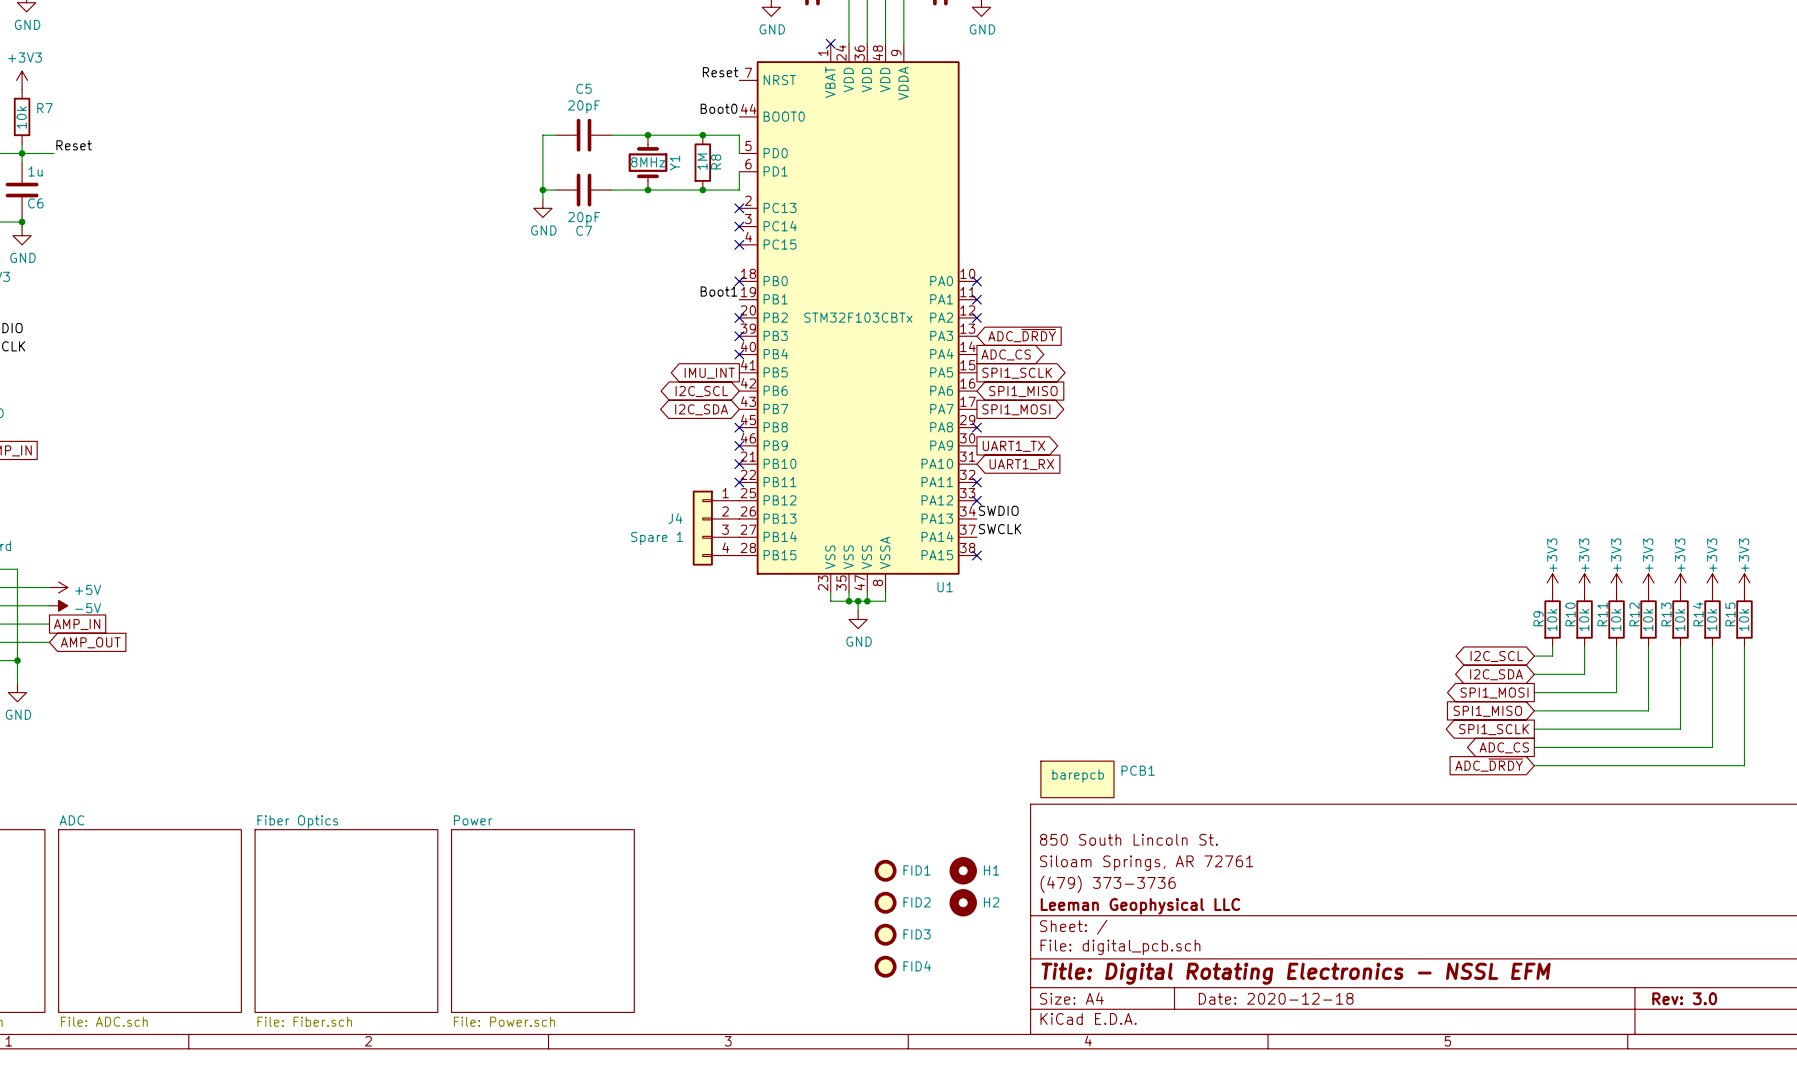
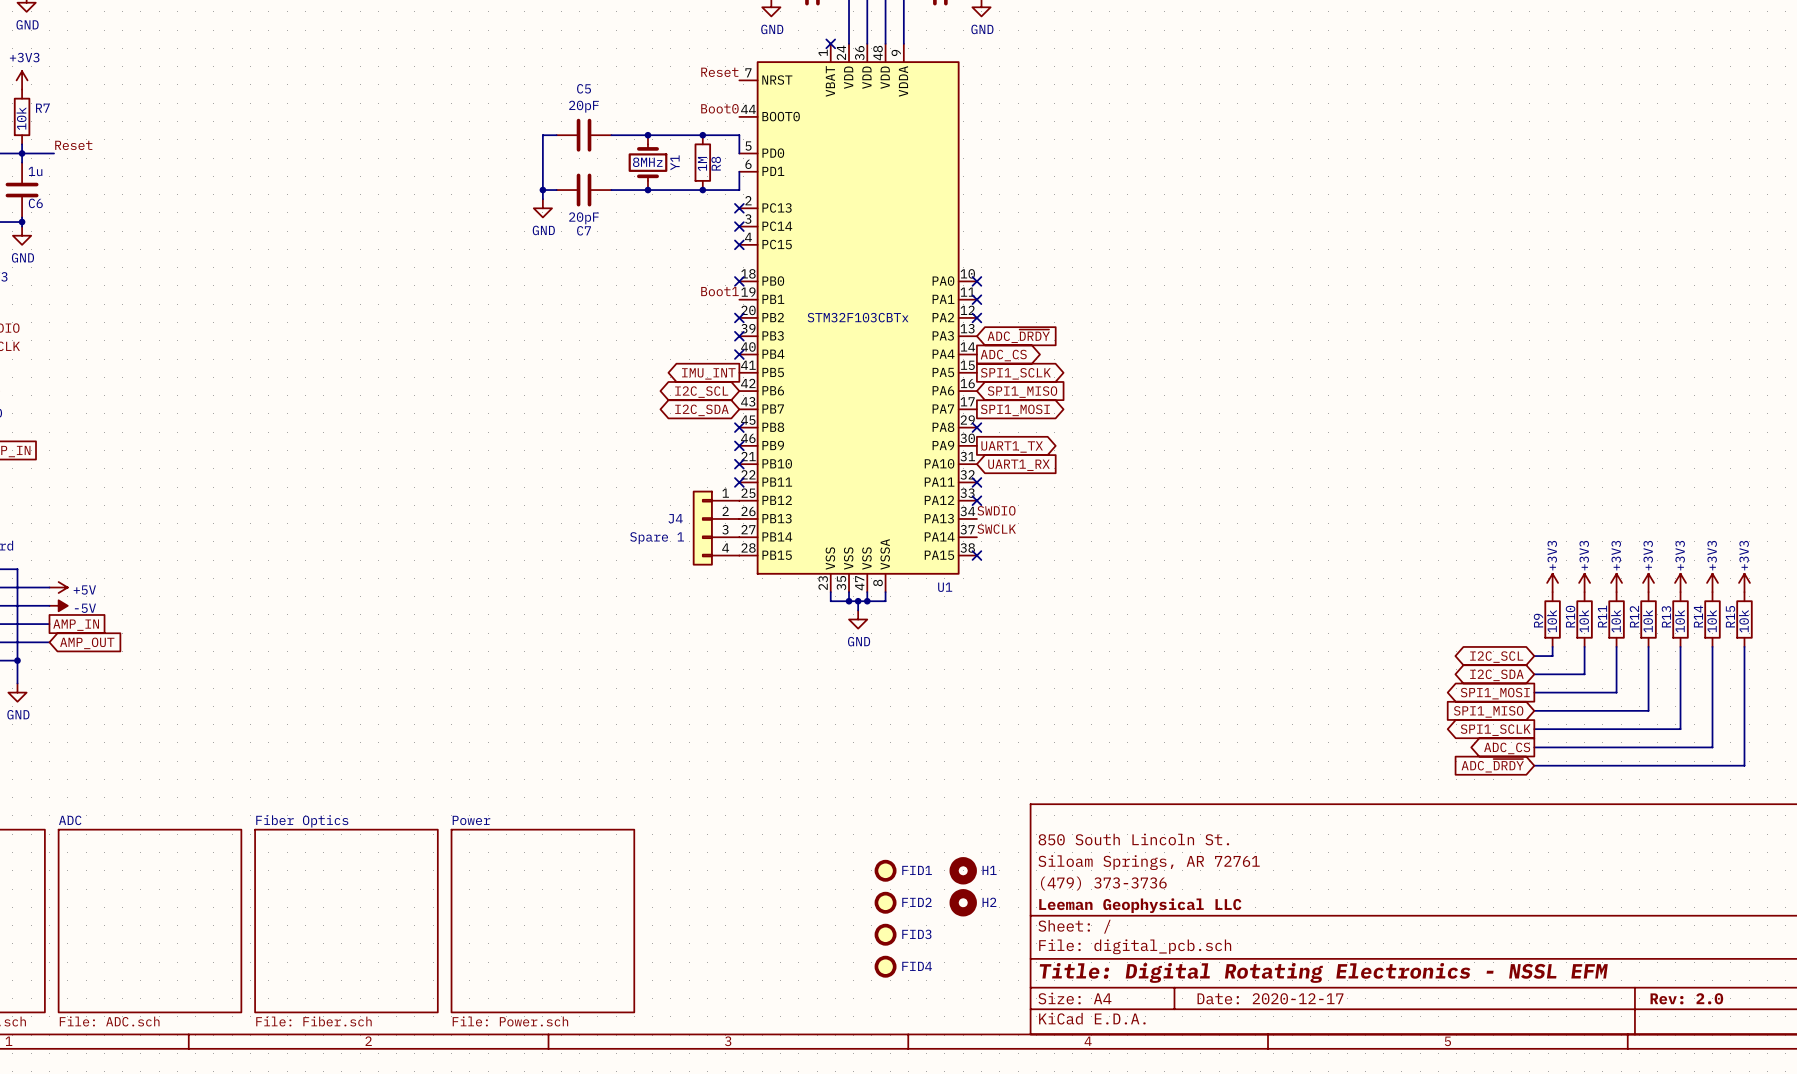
PCB1: barepcb (1077, 779) -> none
title block: Date: 2020-12-18 (1276, 998) -> Date: 2020-12-17 (1270, 998)
title block: Rev: 3.0 (1684, 998) -> Rev: 2.0 (1686, 998)

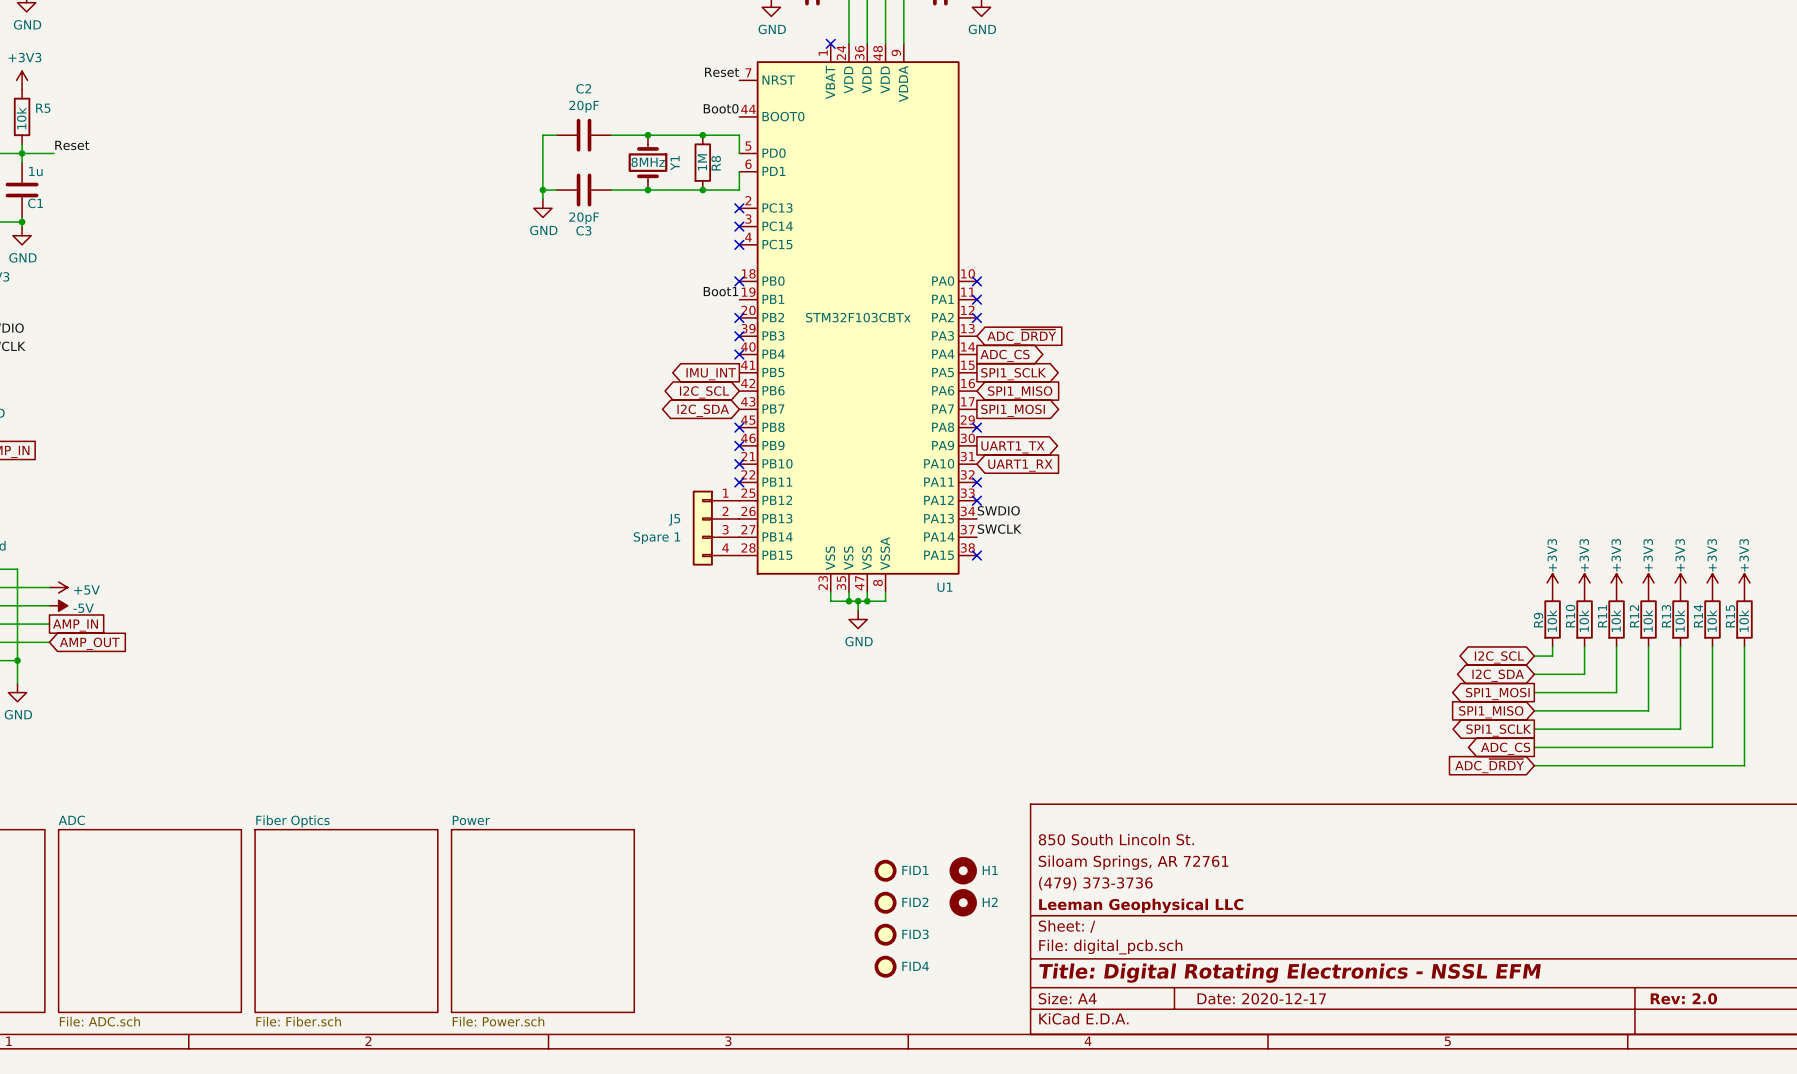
C5 name: C5 (584, 88) -> C2 (583, 88)
R7 name: R7 (42, 108) -> R5 (43, 108)
C6 name: C6 (35, 203) -> C1 (35, 203)
C7 name: C7 (584, 230) -> C3 (583, 230)
J4 name: J4 (675, 518) -> J5 (674, 519)

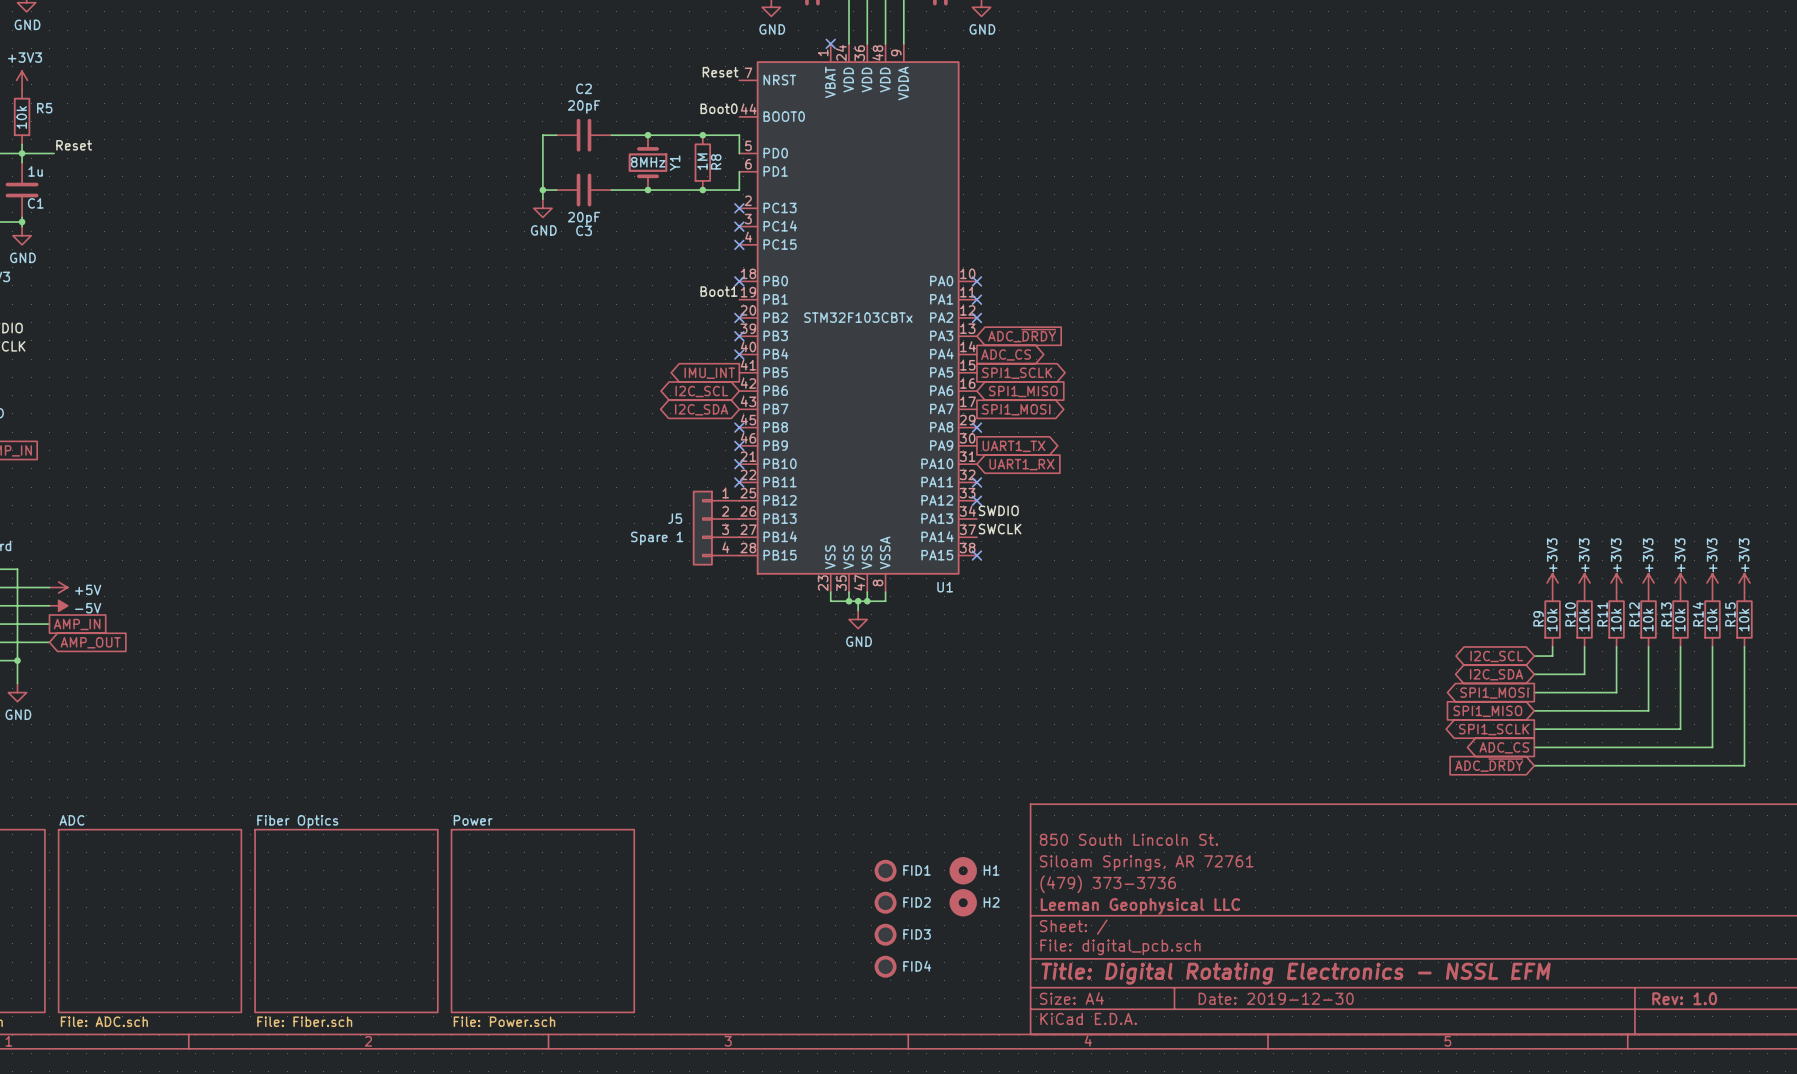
title block: Date: 2020-12-17 (1261, 998) -> Date: 2019-12-30 (1276, 998)
title block: Rev: 2.0 (1683, 998) -> Rev: 1.0 (1684, 998)

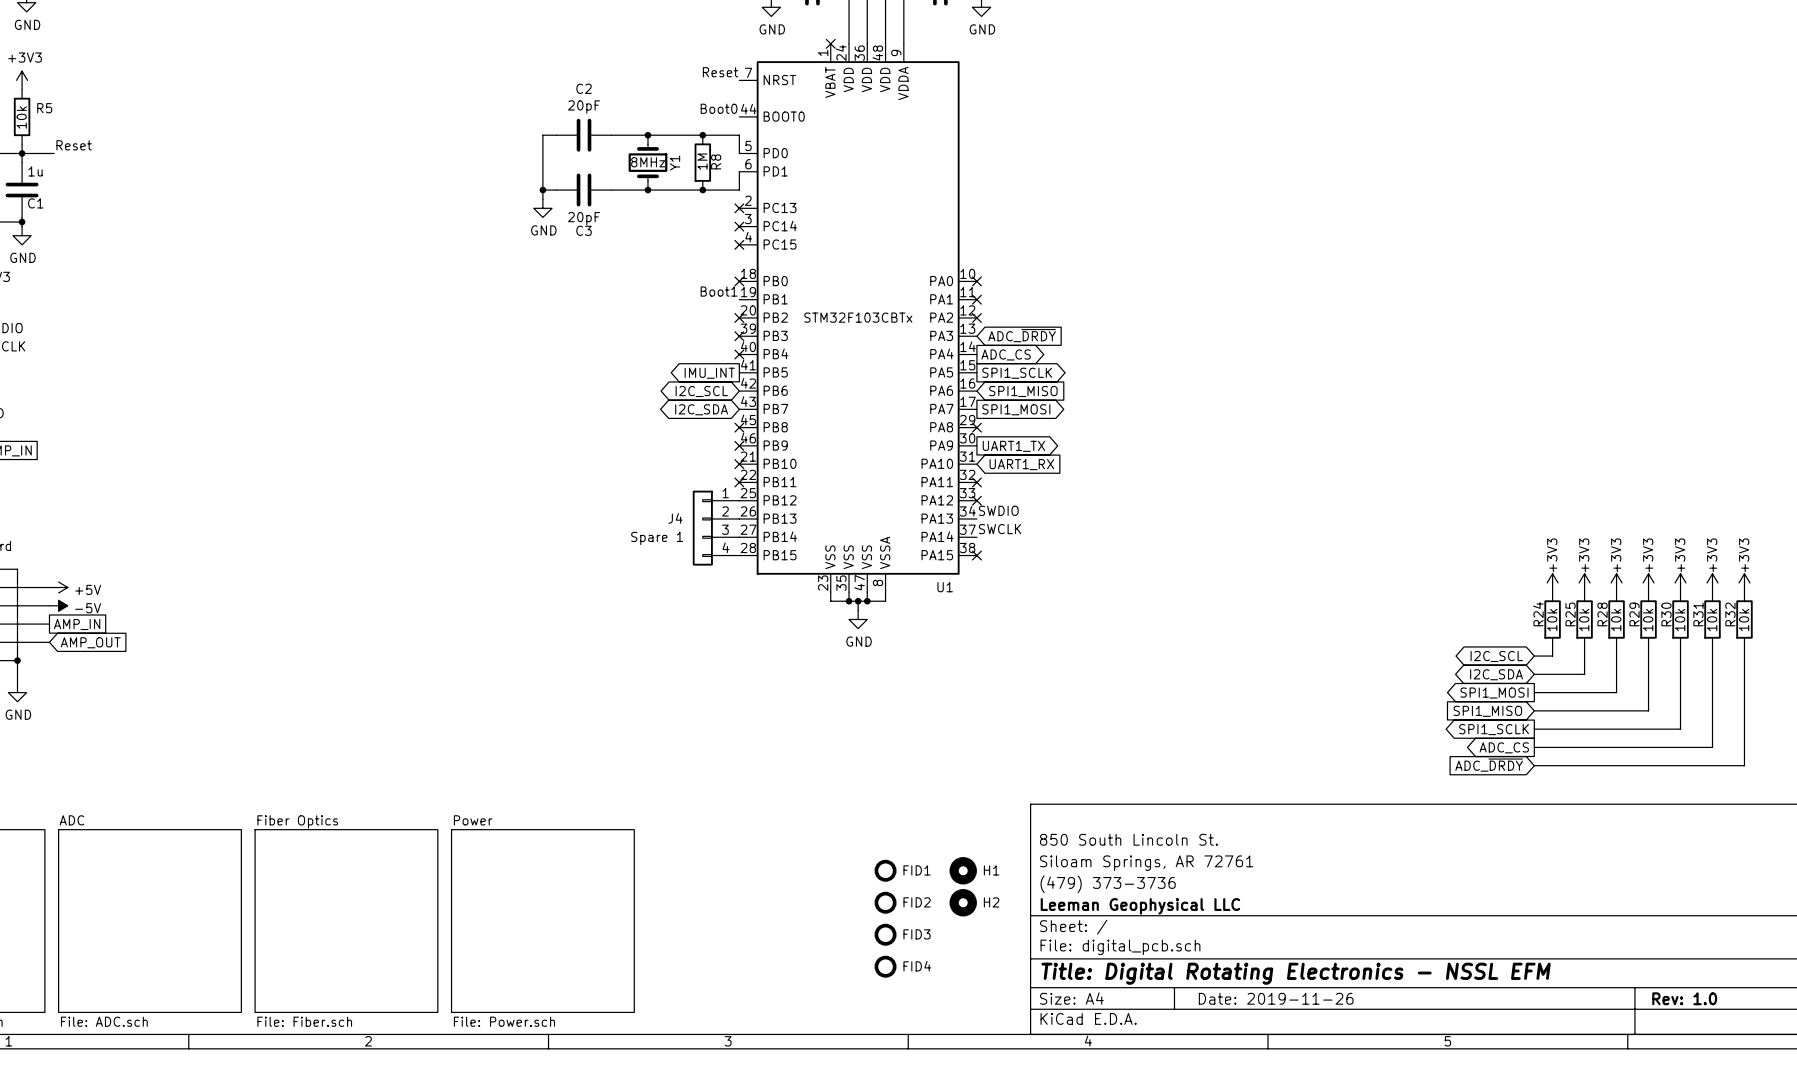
J5 name: J5 (675, 518) -> J4 (675, 518)
R10 name: R10 (1570, 614) -> R25 (1570, 614)
R11 name: R11 (1602, 614) -> R28 (1602, 614)
R12 name: R12 (1634, 614) -> R29 (1634, 614)
R13 name: R13 (1666, 614) -> R30 (1666, 614)
R14 name: R14 (1698, 614) -> R31 (1698, 614)
R15 name: R15 (1730, 614) -> R32 (1730, 614)
R9 name: R9 (1538, 618) -> R24 (1538, 614)
title block: Date: 2019-12-30 (1276, 998) -> Date: 2019-11-26 (1276, 998)

